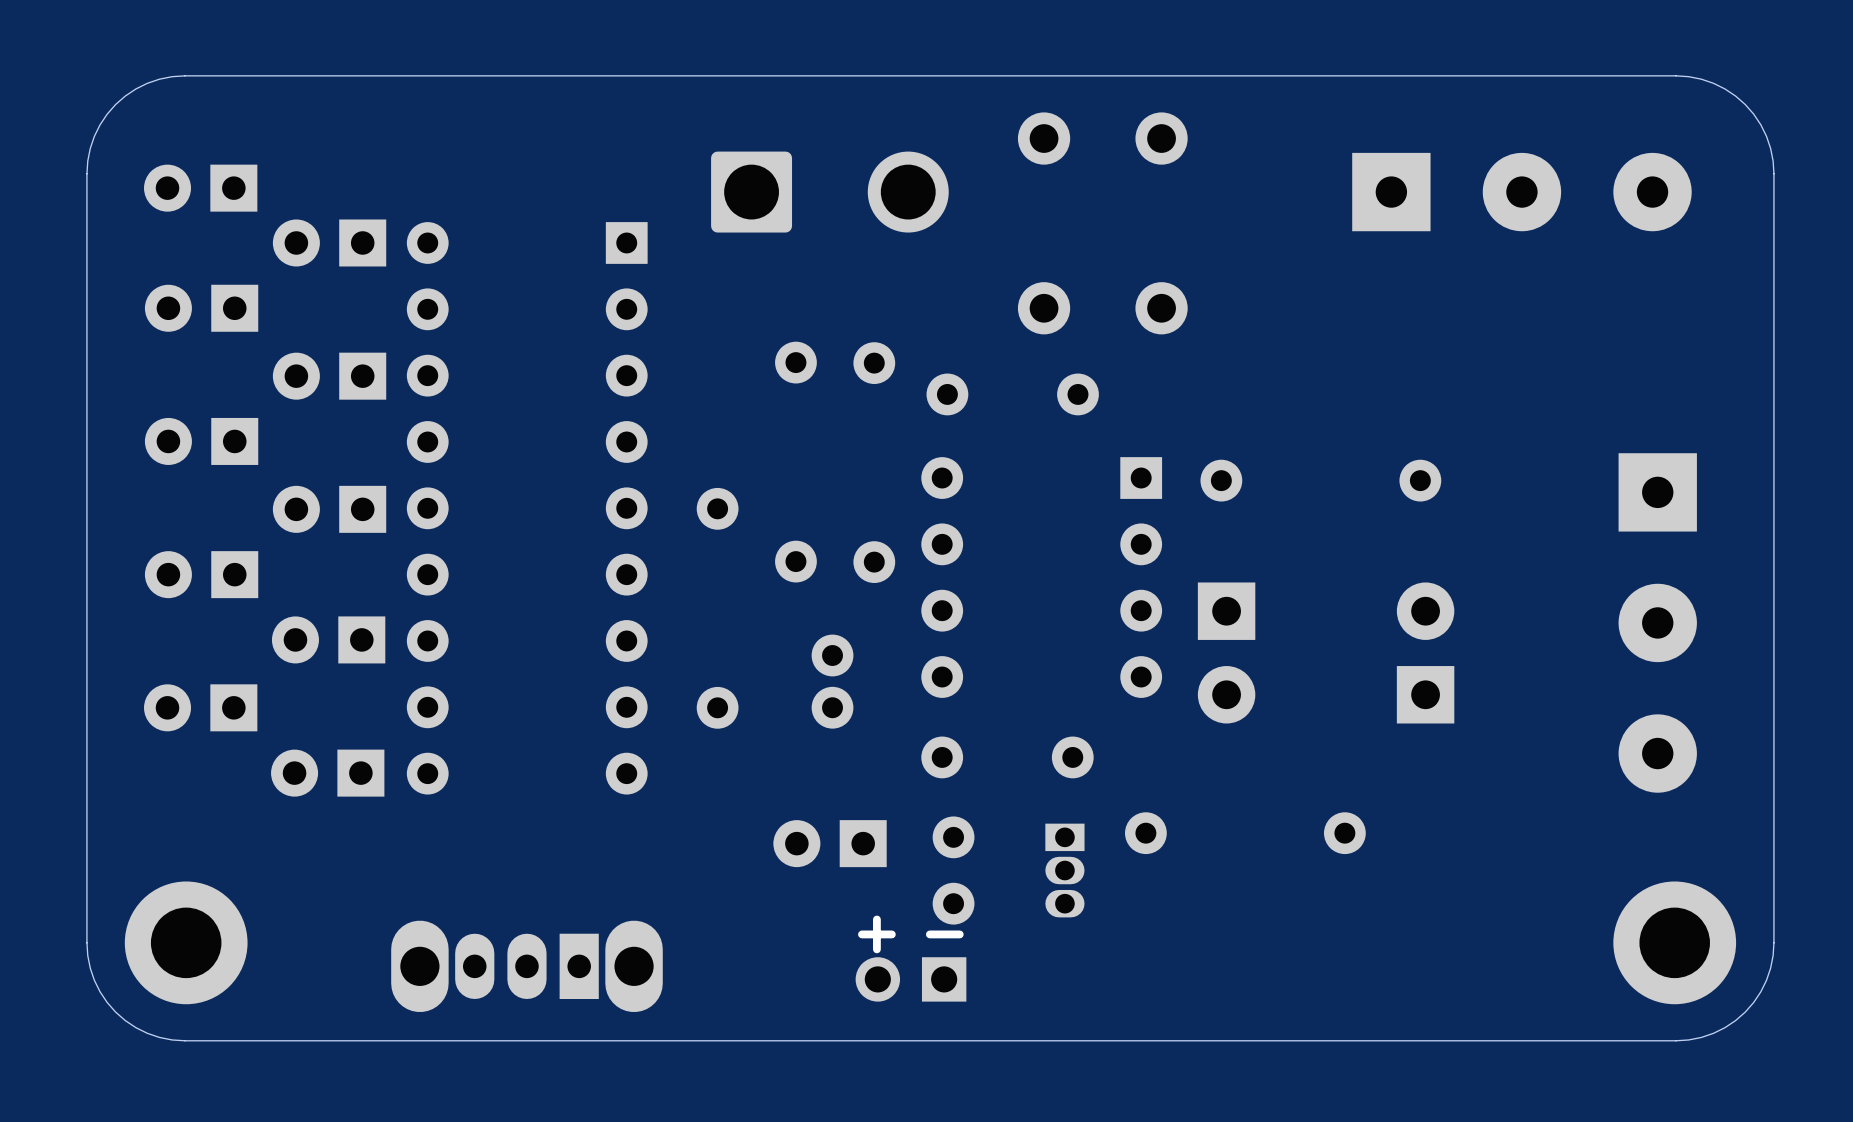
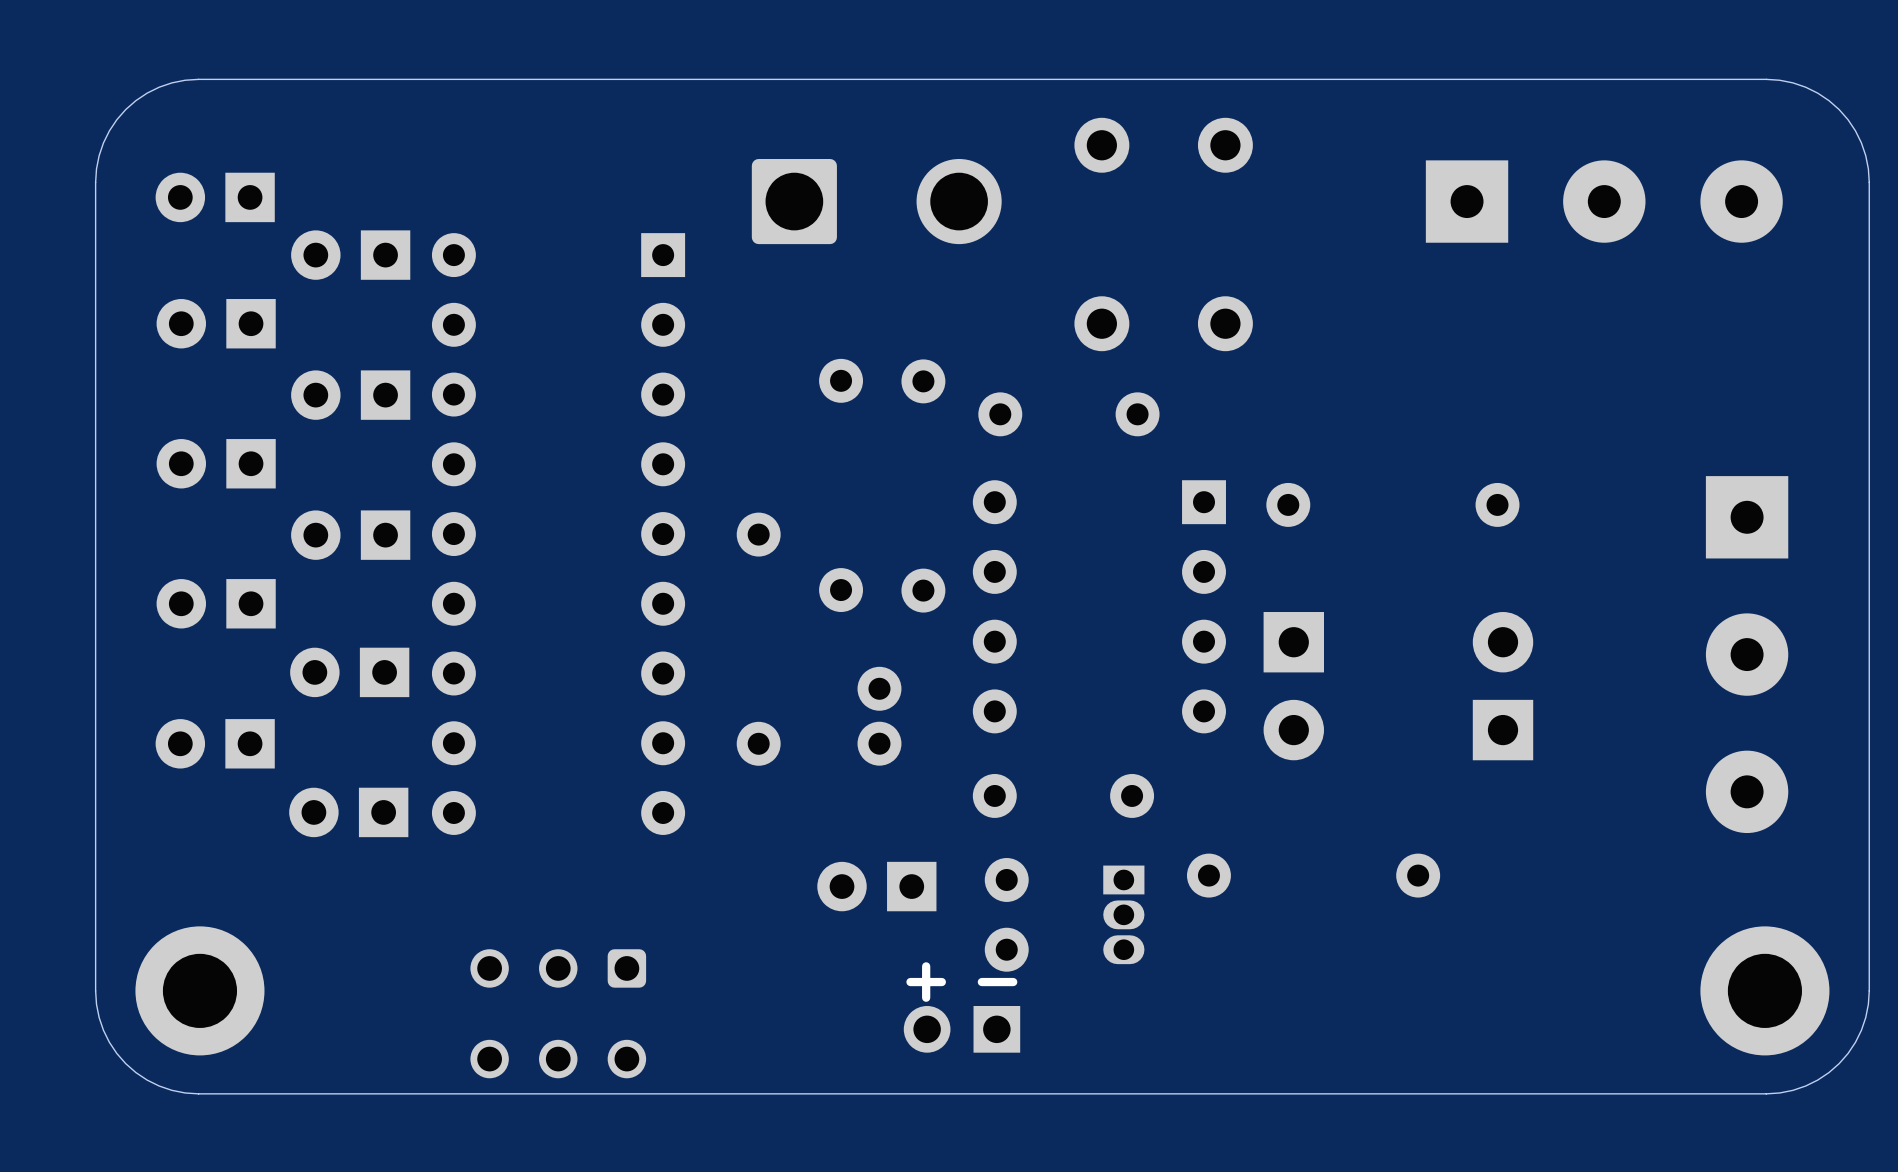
part footprint: [391, 920, 663, 1013] -> [470, 949, 647, 1079]

